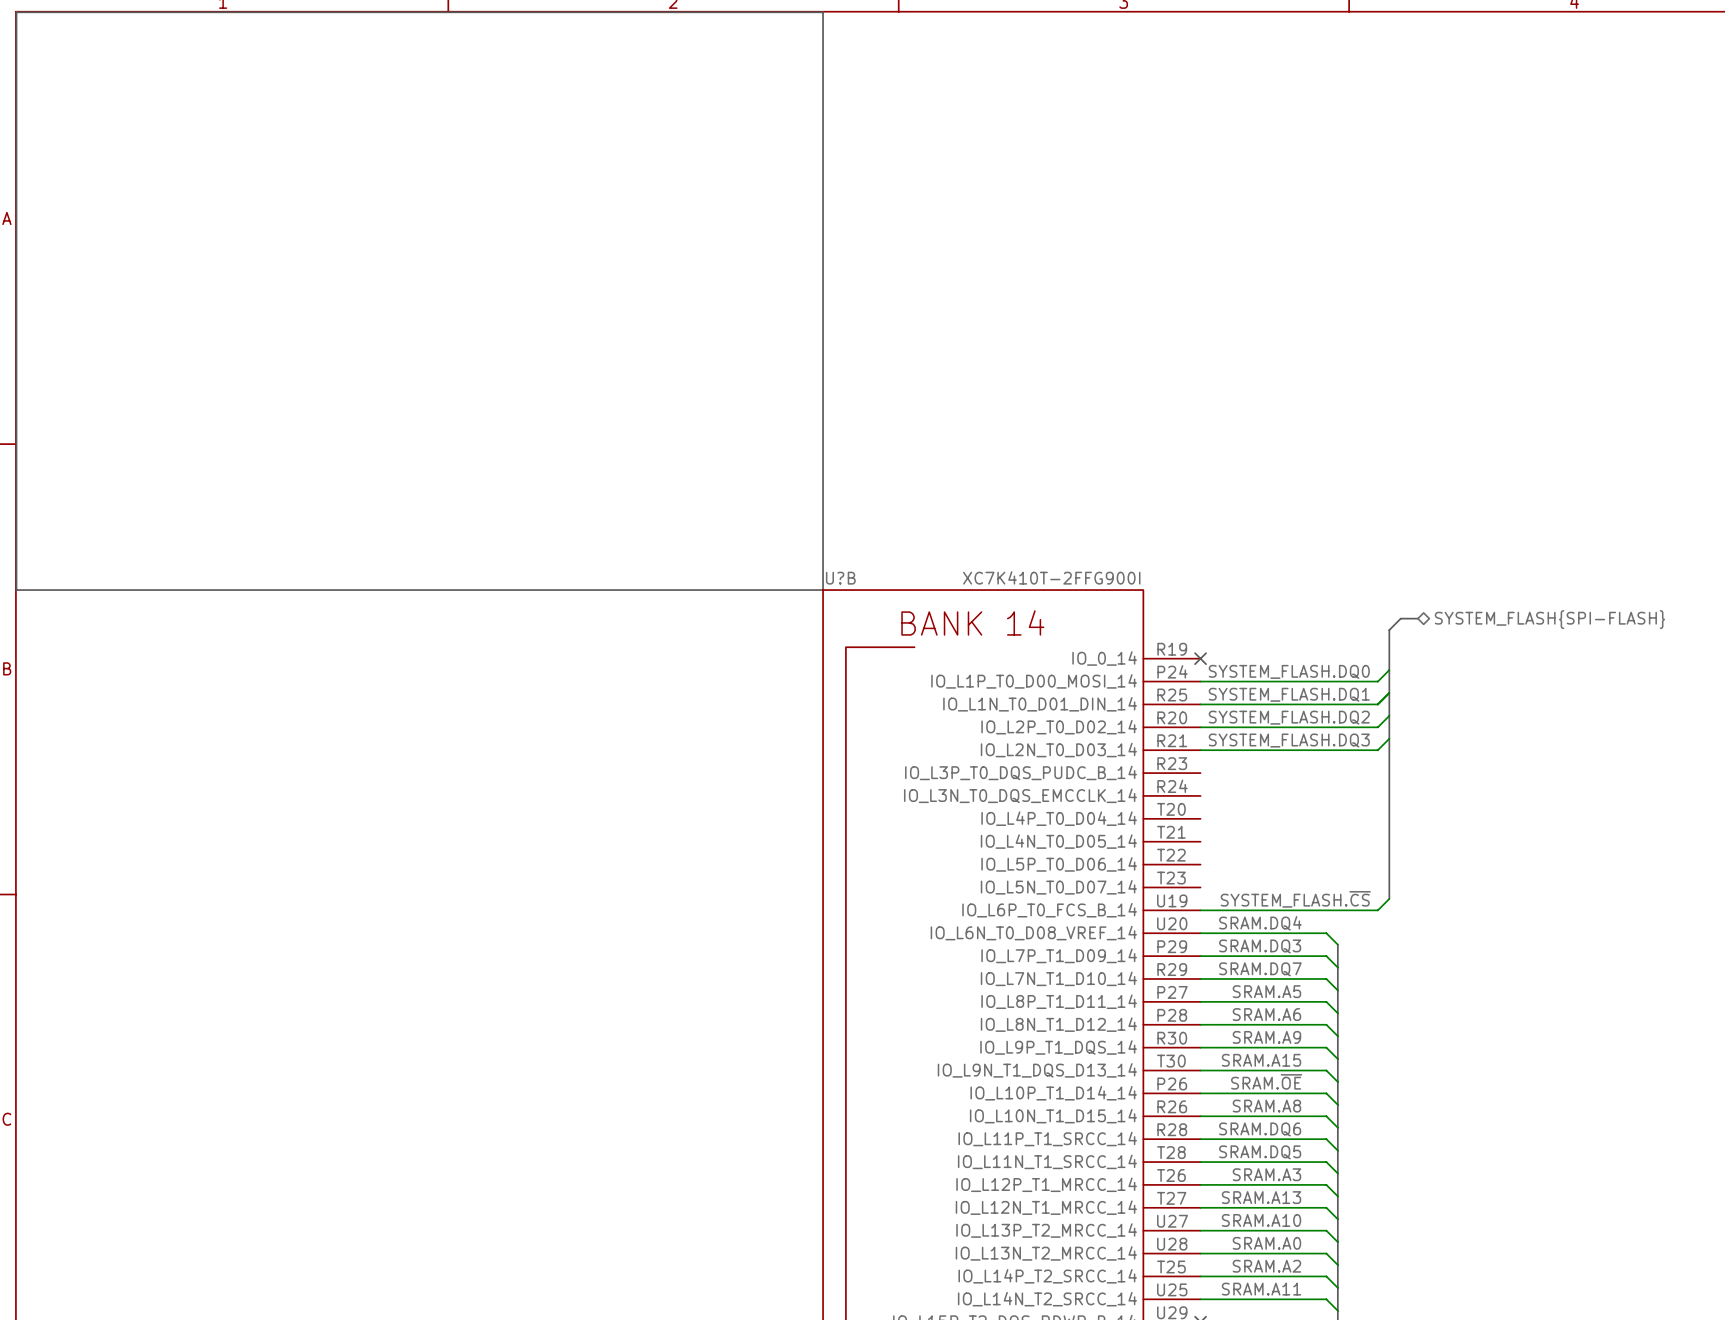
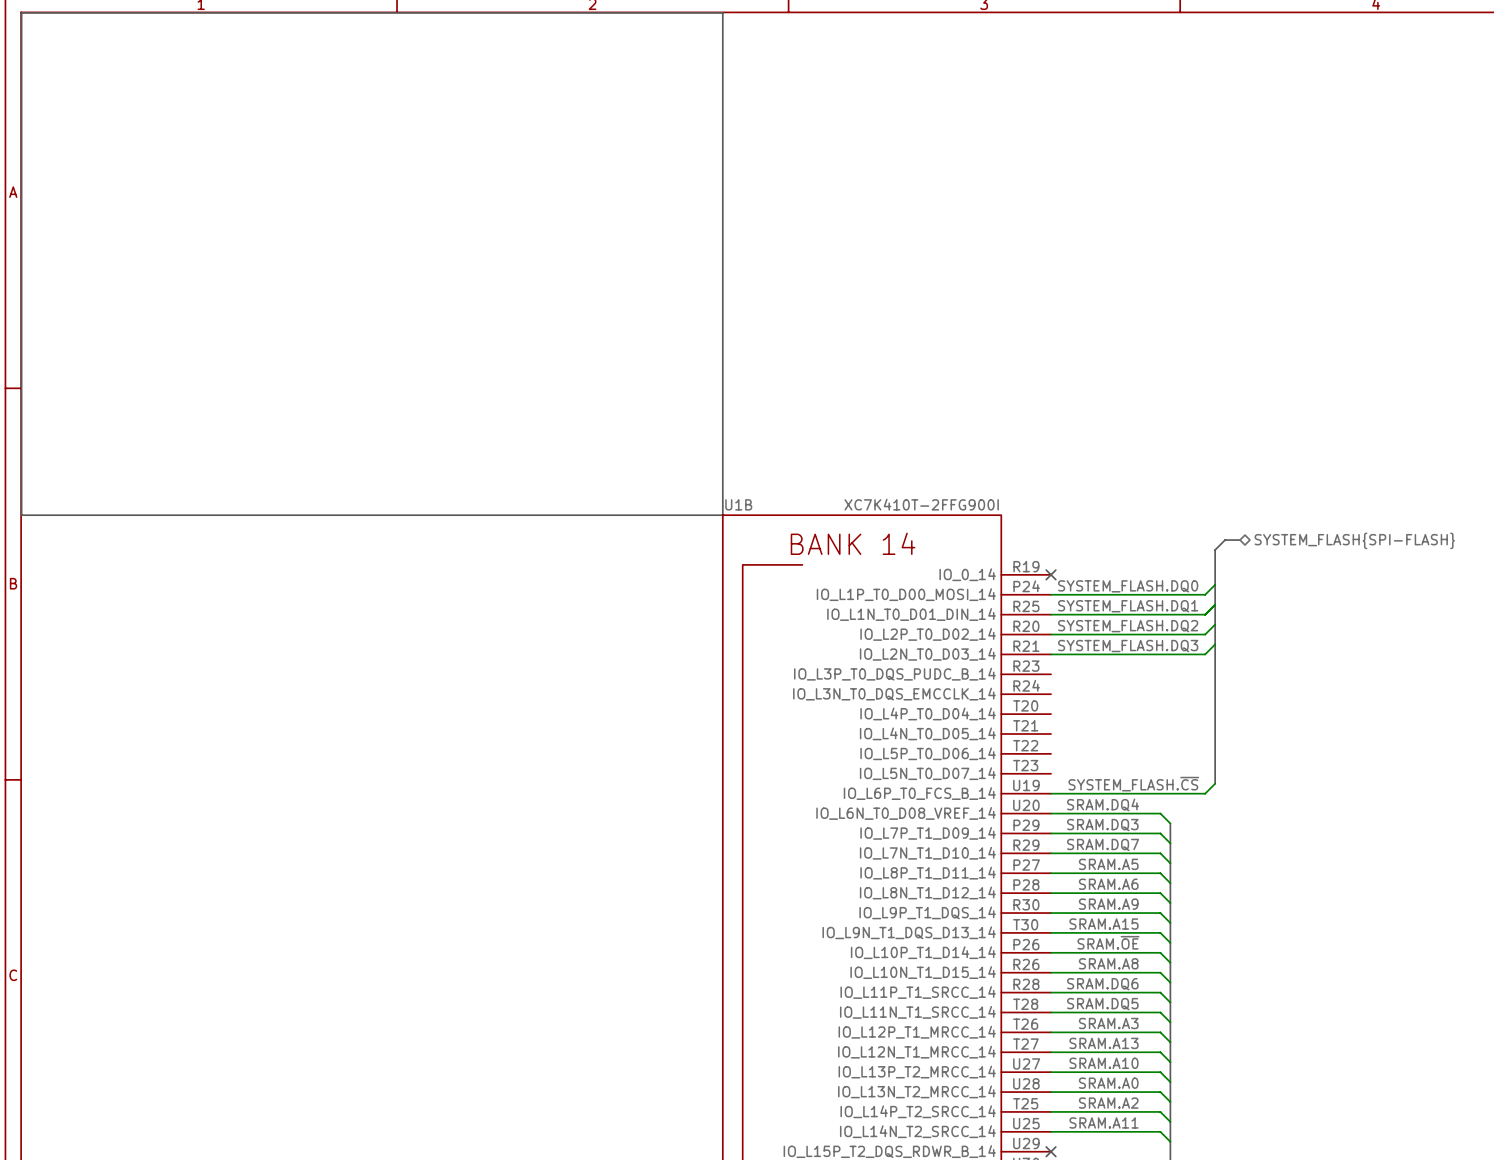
U?B name: U?B (840, 578) -> U1B (738, 504)

